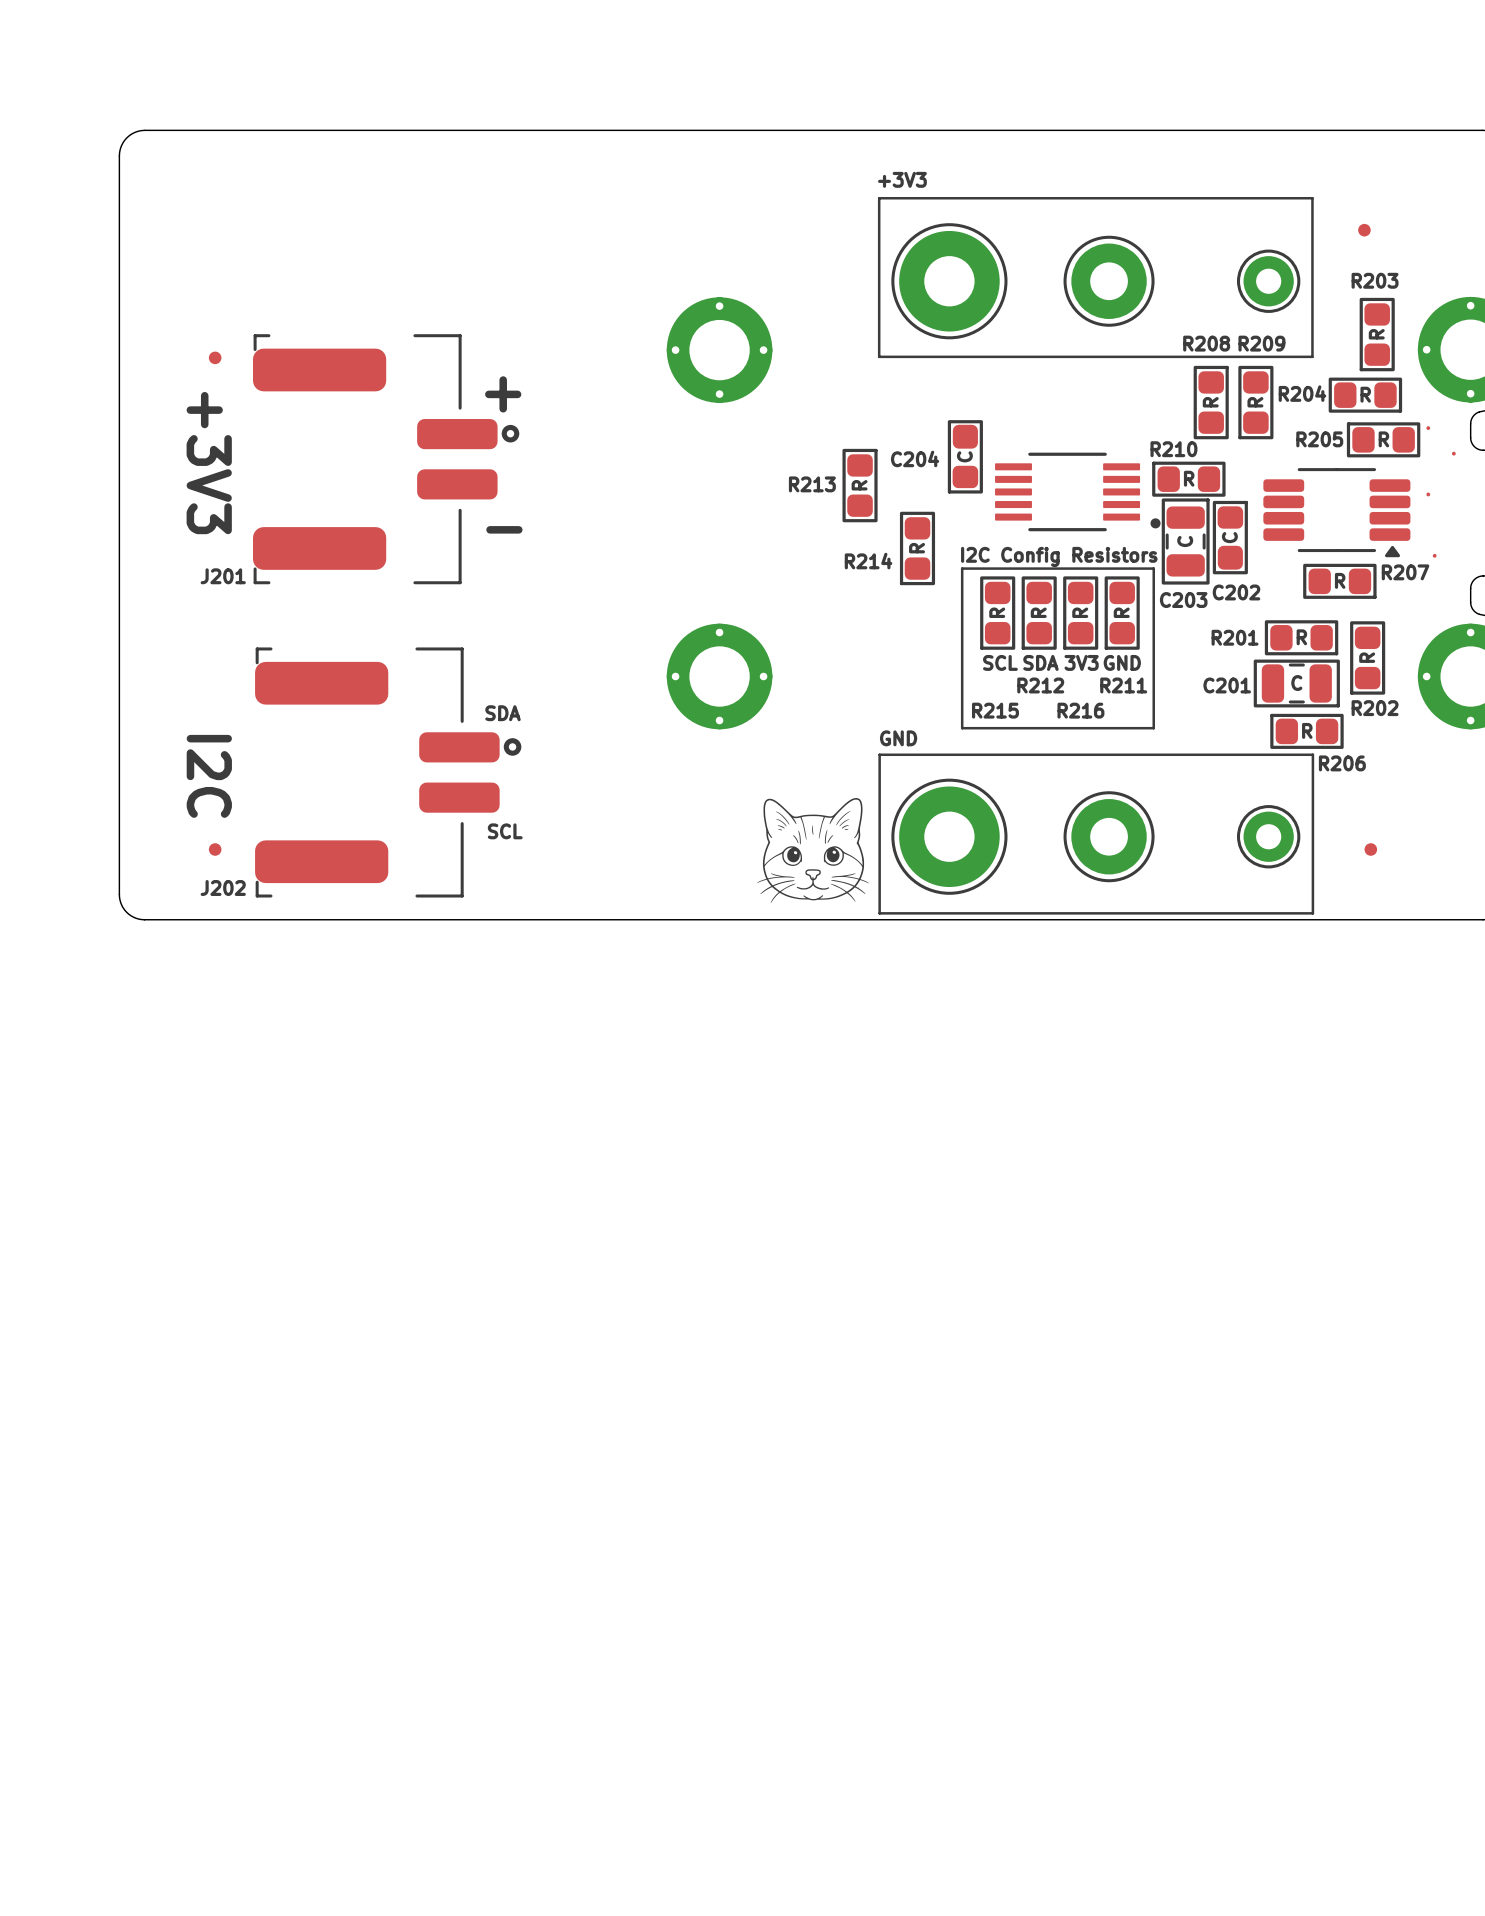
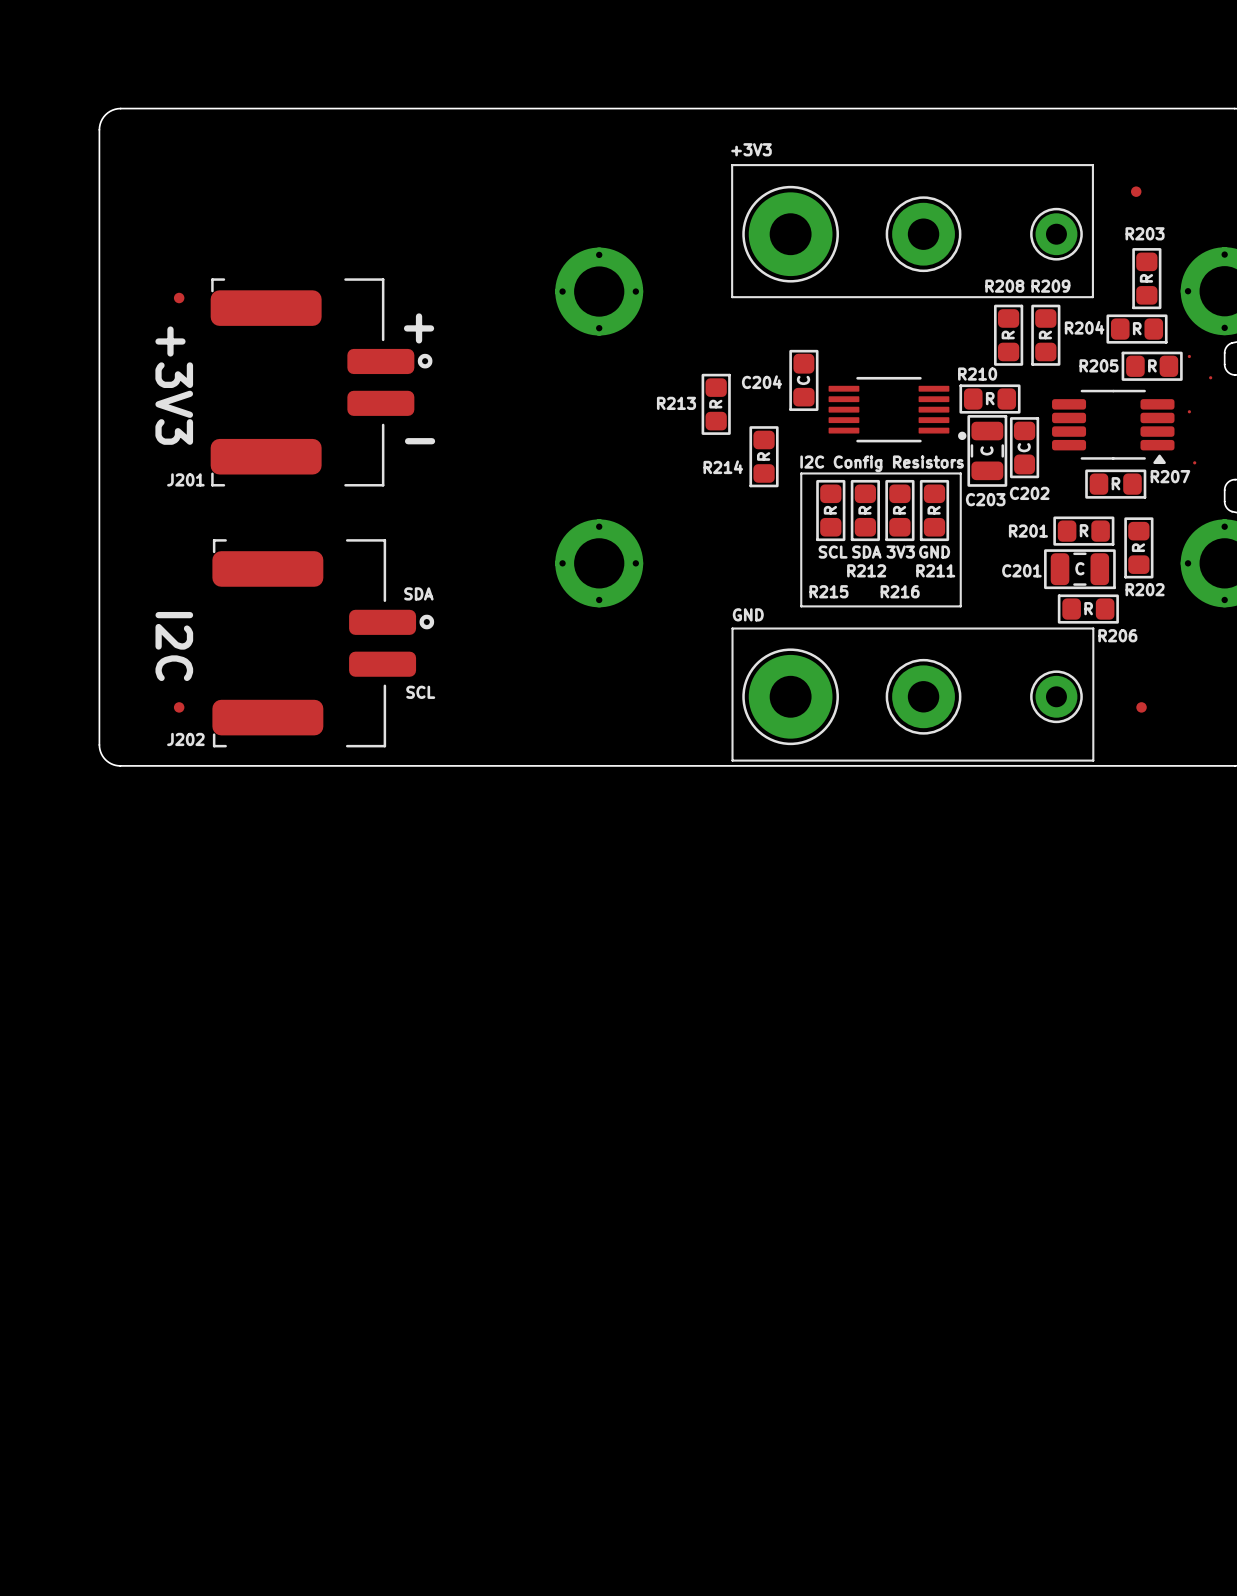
drawing: [757, 798, 870, 904] -> none

